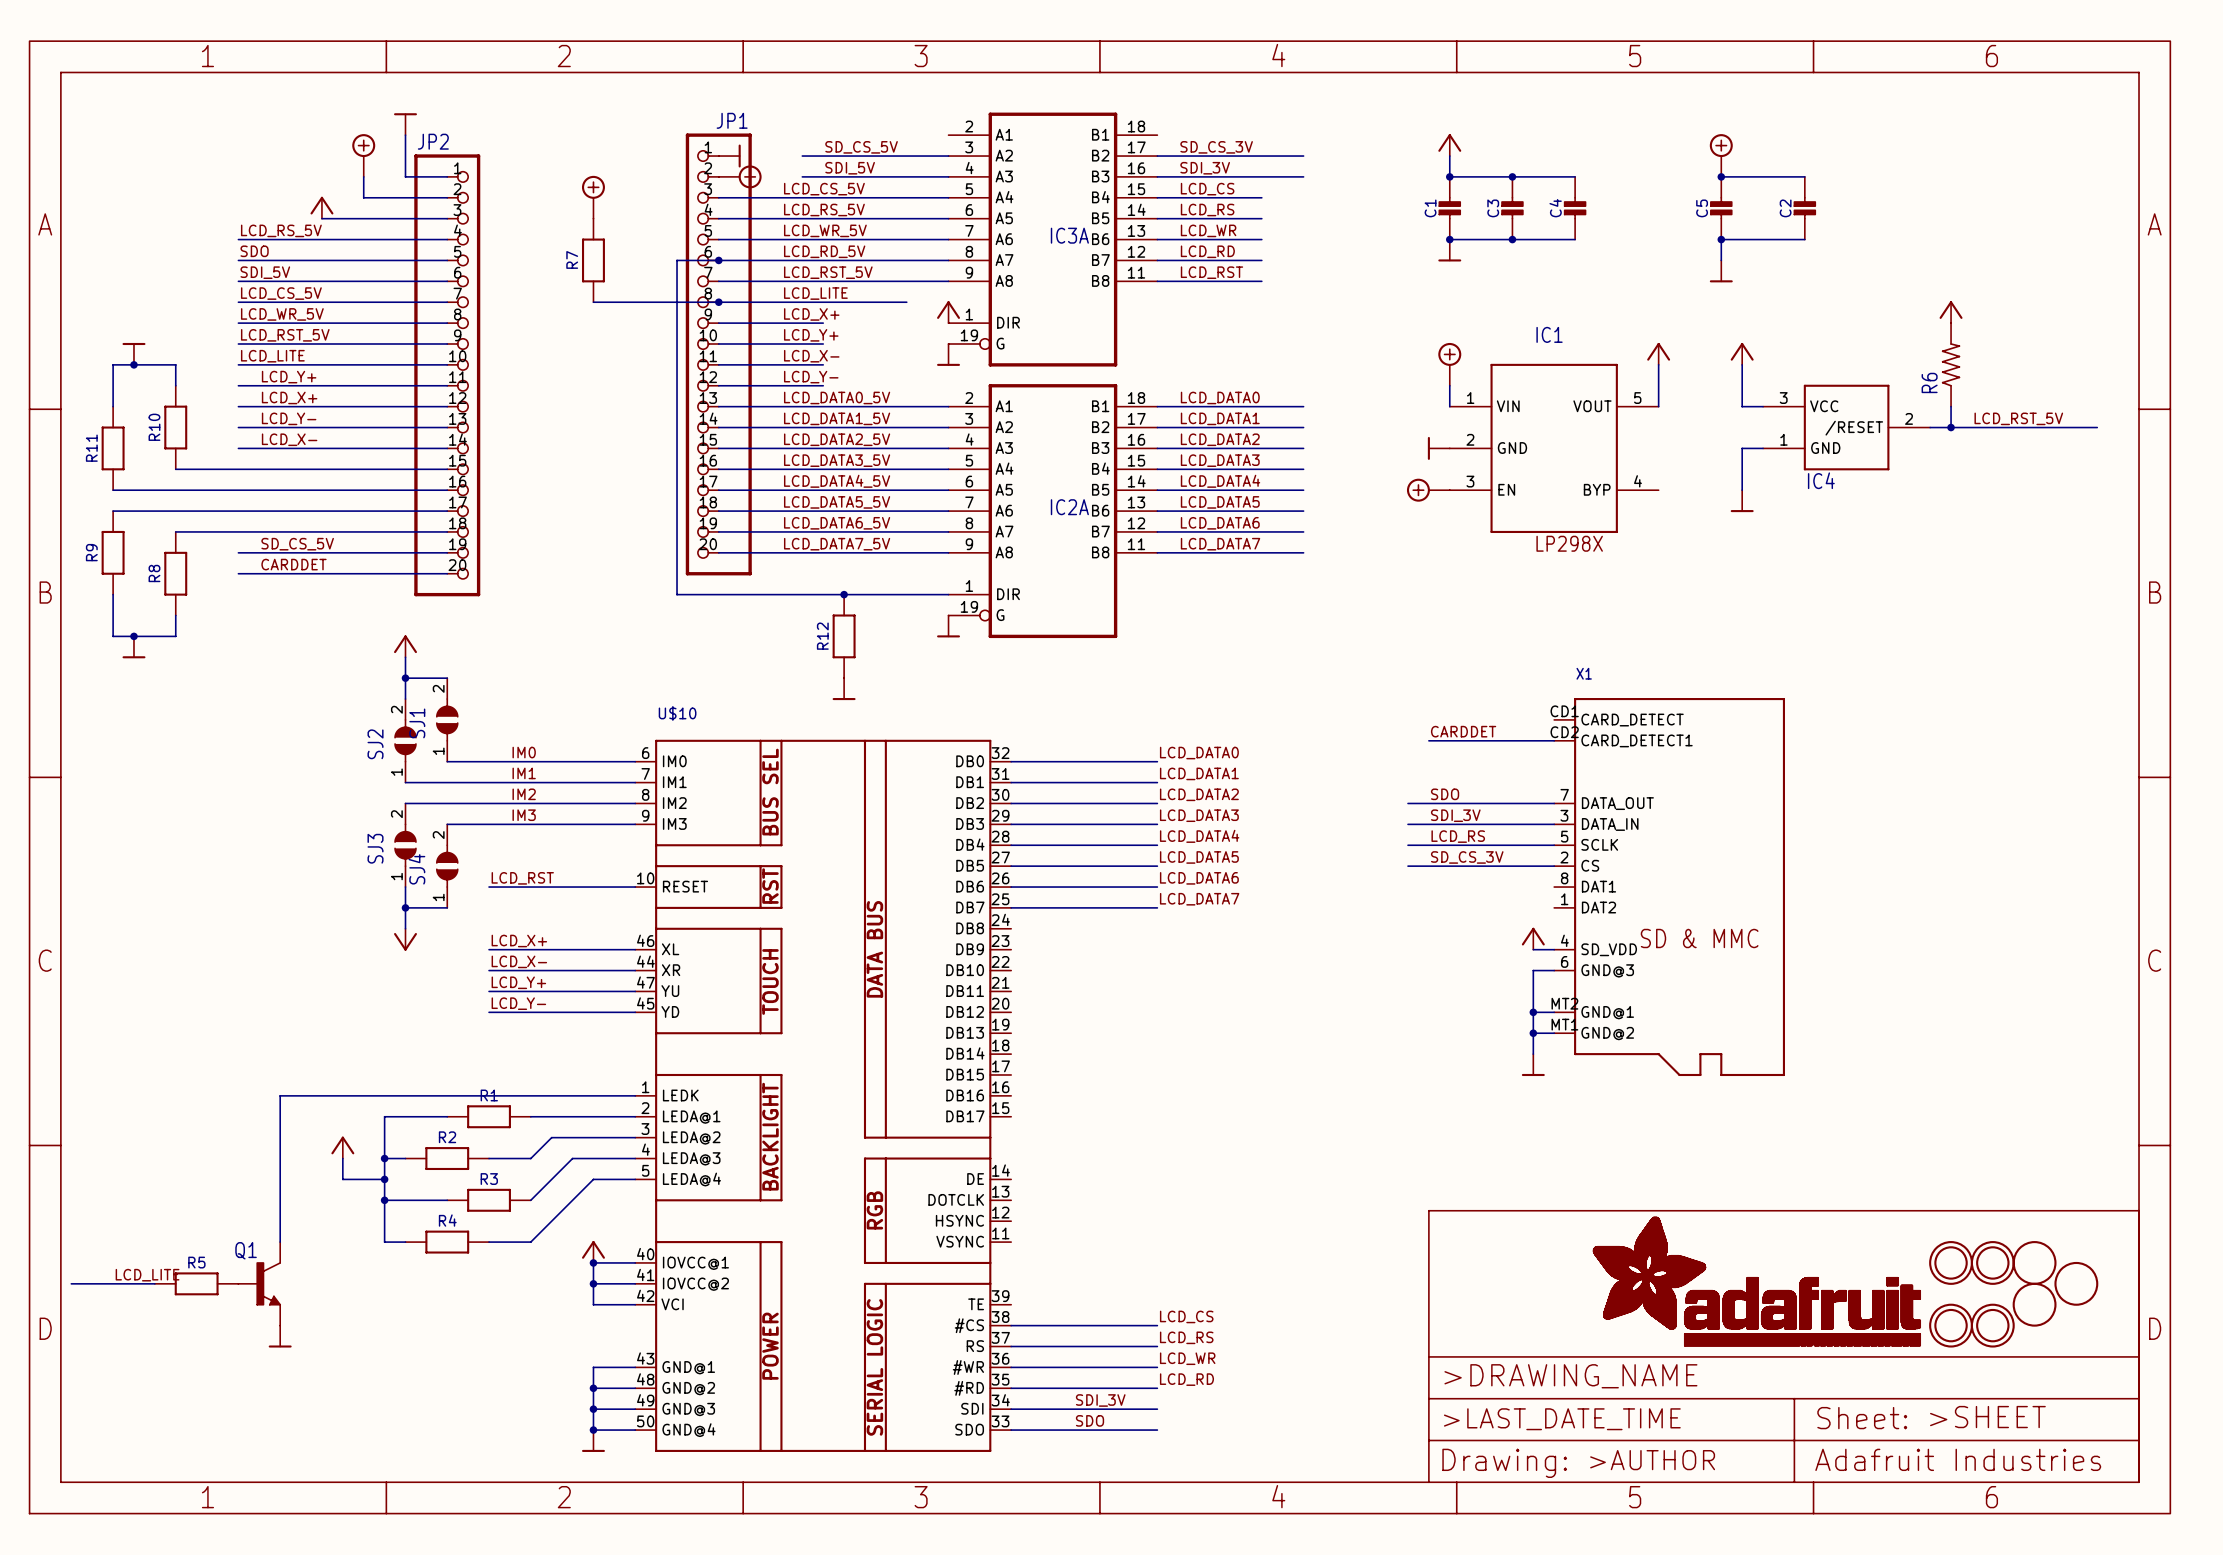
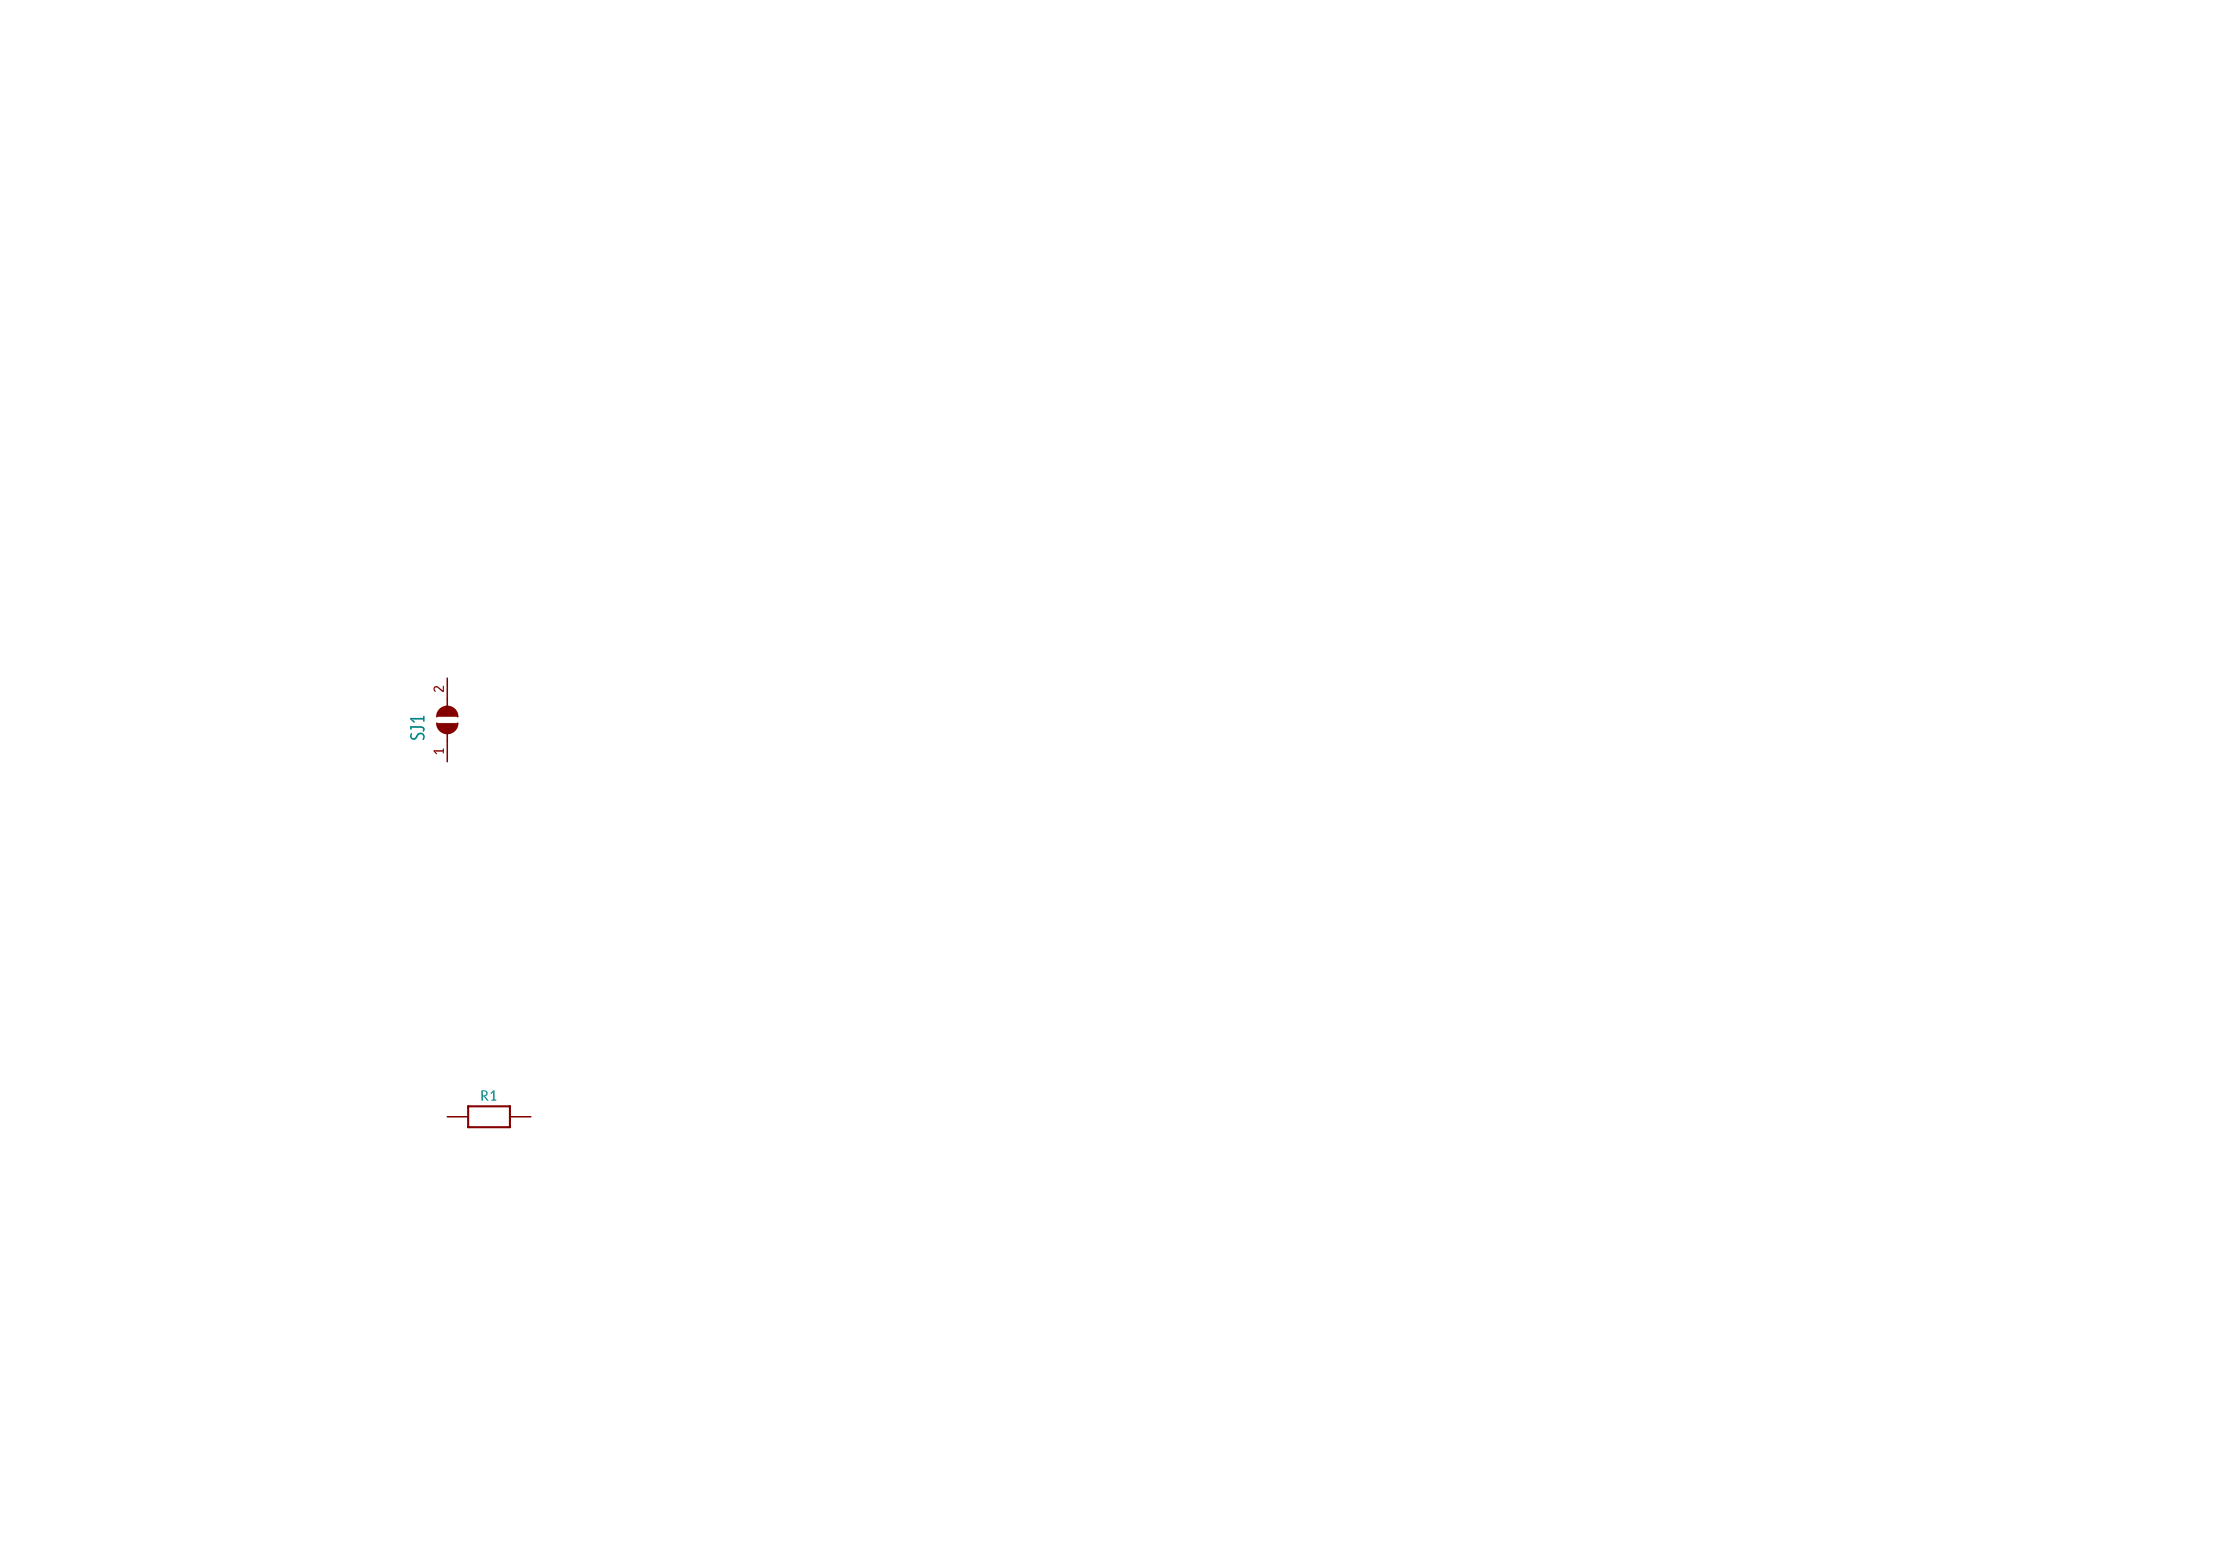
drawing: [29, 41, 2171, 1514] -> none
power symbol: (405, 124) -> none
wire: (405, 135) (405, 176) (447, 176) -> none
power symbol: (1449, 145) -> none
label: SD_CS_5V (861, 147) -> none
label: SD_CS_3V (1216, 147) -> none
power symbol: (363, 155) -> none
power symbol: (1721, 155) -> none
power symbol: (729, 156) -> none
wire: (802, 156) (948, 156) -> none
wire: (1157, 156) (1303, 156) -> none
wire: (1449, 156) (1449, 176) (1575, 176) -> none
label: SDI_5V (850, 168) -> none
label: SDI_3V (1205, 168) -> none
wire: (363, 176) (363, 197) (447, 197) -> none
power symbol: (740, 176) -> none
wire: (802, 176) (948, 176) -> none
wire: (1157, 176) (1303, 176) -> none
junction: (1449, 176) -> none
junction: (1512, 176) -> none
wire: (1721, 176) (1804, 176) -> none
junction: (1721, 176) -> none
label: LCD_CS_5V (824, 189) -> none
label: LCD_CS (1207, 189) -> none
power symbol: (593, 197) -> none
wire: (718, 197) (948, 197) -> none
wire: (1157, 197) (1261, 197) -> none
power symbol: (321, 207) -> none
C1: (1449, 208) -> none
C3: (1512, 208) -> none
C4: (1575, 208) -> none
C5: (1721, 208) -> none
C2: (1804, 208) -> none
label: LCD_RS_5V (824, 210) -> none
label: LCD_RS (1207, 210) -> none
wire: (321, 218) (447, 218) -> none
wire: (718, 218) (948, 218) -> none
wire: (1157, 218) (1261, 218) -> none
label: LCD_RS_5V (281, 230) -> none
label: LCD_WR_5V (825, 230) -> none
label: LCD_WR (1208, 230) -> none
wire: (238, 239) (447, 239) -> none
wire: (718, 239) (948, 239) -> none
IC3A: (1052, 239) -> none
wire: (1157, 239) (1261, 239) -> none
wire: (1449, 239) (1575, 239) -> none
junction: (1449, 239) -> none
junction: (1512, 239) -> none
junction: (1721, 239) -> none
wire: (1804, 239) (1721, 239) (1721, 260) -> none
power symbol: (1449, 250) -> none
label: SDO (254, 251) -> none
label: LCD_RD_5V (824, 251) -> none
label: LCD_RD (1207, 251) -> none
wire: (238, 260) (447, 260) -> none
R7: (593, 260) -> none
junction: (718, 260) -> none
wire: (948, 260) (677, 260) (677, 594) (948, 594) -> none
wire: (1157, 260) (1261, 260) -> none
power symbol: (1721, 271) -> none
label: SDI_5V (265, 272) -> none
label: LCD_RST_5V (828, 272) -> none
label: LCD_RST (1211, 272) -> none
wire: (238, 281) (447, 281) -> none
wire: (718, 281) (948, 281) -> none
wire: (1157, 281) (1261, 281) -> none
label: LCD_CS_5V (281, 293) -> none
label: LCD_LITE (815, 293) -> none
wire: (238, 302) (447, 302) -> none
wire: (593, 302) (906, 302) -> none
junction: (718, 302) -> none
power symbol: (948, 312) -> none
power symbol: (1951, 312) -> none
label: LCD_WR_5V (282, 314) -> none
label: LCD_X+ (811, 314) -> none
wire: (238, 323) (447, 323) -> none
wire: (718, 323) (823, 323) -> none
label: LCD_RST_5V (285, 335) -> none
label: LCD_Y+ (811, 335) -> none
wire: (238, 343) (447, 343) -> none
wire: (718, 343) (823, 343) -> none
power symbol: (133, 353) -> none
power symbol: (1658, 353) -> none
power symbol: (1742, 353) -> none
JP1: (718, 354) -> none
power symbol: (948, 354) -> none
label: LCD_LITE (272, 356) -> none
label: LCD_X- (811, 356) -> none
junction: (133, 364) -> none
wire: (238, 364) (447, 364) -> none
wire: (718, 364) (823, 364) -> none
power symbol: (1449, 364) -> none
wire: (1658, 364) (1658, 406) -> none
wire: (1742, 364) (1742, 406) (1763, 406) -> none
R6: (1951, 364) -> none
JP2: (447, 375) -> none
label: LCD_Y+ (289, 377) -> none
label: LCD_Y- (811, 377) -> none
wire: (175, 385) (175, 364) (113, 364) (113, 406) -> none
wire: (238, 385) (447, 385) -> none
wire: (718, 385) (823, 385) -> none
wire: (1449, 385) (1449, 406) -> none
label: LCD_X+ (289, 397) -> none
label: LCD_DATA0_5V (837, 397) -> none
label: LCD_DATA0 (1220, 397) -> none
wire: (238, 406) (447, 406) -> none
wire: (718, 406) (948, 406) -> none
wire: (1157, 406) (1303, 406) -> none
wire: (1951, 406) (1951, 427) -> none
label: LCD_Y- (289, 418) -> none
label: LCD_DATA1_5V (837, 418) -> none
label: LCD_DATA1 (1220, 418) -> none
label: LCD_RST_5V (2018, 418) -> none
R10: (175, 427) -> none
wire: (238, 427) (447, 427) -> none
wire: (718, 427) (948, 427) -> none
wire: (1157, 427) (1303, 427) -> none
IC4: (1846, 427) -> none
wire: (1930, 427) (2097, 427) -> none
junction: (1951, 427) -> none
label: LCD_X- (289, 439) -> none
label: LCD_DATA2_5V (837, 439) -> none
label: LCD_DATA2 (1220, 439) -> none
R11: (113, 448) -> none
wire: (238, 448) (447, 448) -> none
wire: (718, 448) (948, 448) -> none
wire: (1157, 448) (1303, 448) -> none
power symbol: (1438, 448) -> none
IC1: (1554, 448) -> none
wire: (1763, 448) (1742, 448) (1742, 490) -> none
label: LCD_DATA3_5V (837, 460) -> none
label: LCD_DATA3 (1220, 460) -> none
wire: (175, 469) (447, 469) -> none
wire: (718, 469) (948, 469) -> none
wire: (1157, 469) (1303, 469) -> none
label: LCD_DATA4_5V (837, 481) -> none
label: LCD_DATA4 (1220, 481) -> none
wire: (113, 490) (447, 490) -> none
wire: (718, 490) (948, 490) -> none
wire: (1157, 490) (1303, 490) -> none
power symbol: (1428, 490) -> none
power symbol: (1742, 501) -> none
label: LCD_DATA5_5V (837, 502) -> none
label: LCD_DATA5 (1220, 502) -> none
wire: (113, 511) (447, 511) -> none
wire: (718, 511) (948, 511) -> none
IC2A: (1052, 511) -> none
wire: (1157, 511) (1303, 511) -> none
label: LCD_DATA6_5V (837, 523) -> none
label: LCD_DATA6 (1220, 523) -> none
wire: (175, 531) (447, 531) -> none
wire: (718, 531) (948, 531) -> none
wire: (1157, 531) (1303, 531) -> none
label: SD_CS_5V (297, 544) -> none
label: LCD_DATA7_5V (837, 544) -> none
label: LCD_DATA7 (1220, 544) -> none
R9: (113, 552) -> none
wire: (238, 552) (447, 552) -> none
wire: (718, 552) (948, 552) -> none
wire: (1157, 552) (1303, 552) -> none
label: CARDDET (293, 564) -> none
R8: (175, 573) -> none
wire: (238, 573) (447, 573) -> none
wire: (113, 594) (113, 636) (175, 636) (175, 615) -> none
junction: (844, 594) -> none
power symbol: (948, 626) -> none
junction: (133, 636) -> none
R12: (844, 636) -> none
power symbol: (405, 646) -> none
power symbol: (133, 647) -> none
wire: (405, 657) (405, 699) -> none
wire: (405, 678) (447, 678) -> none
junction: (405, 678) -> none
power symbol: (844, 689) -> none
label: CARDDET (1463, 731) -> none
SJ2: (405, 740) -> none
wire: (1428, 740) (1554, 740) -> none
label: IM0 (524, 752) -> none
label: LCD_DATA0 (1199, 753) -> none
wire: (447, 761) (635, 761) -> none
wire: (1011, 761) (1157, 761) -> none
label: IM1 (524, 773) -> none
label: LCD_DATA1 (1199, 773) -> none
wire: (405, 782) (635, 782) -> none
wire: (1011, 782) (1157, 782) -> none
label: IM2 (524, 794) -> none
label: LCD_DATA2 (1199, 794) -> none
label: SDO (1445, 794) -> none
wire: (405, 803) (635, 803) -> none
wire: (1011, 803) (1157, 803) -> none
wire: (1408, 803) (1554, 803) -> none
label: IM3 (524, 815) -> none
label: LCD_DATA3 (1199, 815) -> none
label: SDI_3V (1455, 815) -> none
wire: (447, 824) (635, 824) -> none
wire: (1011, 824) (1157, 824) -> none
wire: (1408, 824) (1554, 824) -> none
label: LCD_DATA4 (1199, 836) -> none
label: LCD_RS (1458, 836) -> none
SJ3: (405, 845) -> none
wire: (1011, 845) (1157, 845) -> none
wire: (1408, 845) (1554, 845) -> none
label: LCD_DATA5 (1199, 857) -> none
label: SD_CS_3V (1467, 857) -> none
SJ4: (447, 866) -> none
wire: (1011, 866) (1157, 866) -> none
wire: (1408, 866) (1554, 866) -> none
label: LCD_RST (522, 878) -> none
label: LCD_DATA6 (1199, 878) -> none
wire: (405, 887) (405, 928) -> none
wire: (489, 887) (635, 887) -> none
wire: (1011, 887) (1157, 887) -> none
X1: (1669, 887) -> none
label: LCD_DATA7 (1199, 899) -> none
wire: (405, 907) (447, 907) -> none
junction: (405, 907) -> none
wire: (1011, 907) (1157, 907) -> none
power symbol: (1533, 938) -> none
power symbol: (405, 939) -> none
label: LCD_X+ (519, 941) -> none
wire: (489, 949) (635, 949) -> none
wire: (1533, 949) (1554, 949) -> none
label: LCD_X- (519, 961) -> none
wire: (489, 970) (635, 970) -> none
wire: (1554, 970) (1533, 970) (1533, 1054) -> none
label: LCD_Y+ (518, 982) -> none
wire: (489, 991) (635, 991) -> none
label: LCD_Y- (518, 1003) -> none
wire: (489, 1012) (635, 1012) -> none
wire: (1533, 1012) (1554, 1012) -> none
junction: (1533, 1012) -> none
wire: (1533, 1033) (1554, 1033) -> none
junction: (1533, 1033) -> none
power symbol: (1533, 1065) -> none
wire: (635, 1095) (280, 1095) (280, 1242) -> none
U$10: (823, 1095) -> none
wire: (447, 1116) (384, 1116) (384, 1242) (405, 1242) -> none
wire: (530, 1116) (635, 1116) -> none
wire: (635, 1137) (551, 1137) (530, 1158) (489, 1158) -> none
power symbol: (342, 1147) -> none
wire: (342, 1158) (342, 1179) (384, 1179) -> none
wire: (384, 1158) (405, 1158) -> none
junction: (384, 1158) -> none
R2: (447, 1158) -> none
wire: (635, 1158) (572, 1158) (530, 1200) -> none
junction: (384, 1179) -> none
wire: (635, 1179) (593, 1179) (530, 1242) (489, 1242) -> none
wire: (384, 1200) (447, 1200) -> none
junction: (384, 1200) -> none
R3: (489, 1200) -> none
R4: (447, 1242) -> none
power symbol: (593, 1252) -> none
junction: (593, 1262) -> none
wire: (635, 1262) (593, 1262) (593, 1304) (635, 1304) -> none
part: (1951, 1262) -> none
part: (1992, 1262) -> none
part: (2034, 1262) -> none
label: LCD_LITE (147, 1275) -> none
wire: (71, 1283) (154, 1283) -> none
R5: (196, 1283) -> none
Q1: (259, 1283) -> none
wire: (593, 1283) (635, 1283) -> none
junction: (593, 1283) -> none
part: (2076, 1283) -> none
part: (2034, 1304) -> none
label: LCD_CS (1186, 1316) -> none
wire: (1011, 1325) (1157, 1325) -> none
part: (1951, 1325) -> none
part: (1992, 1325) -> none
power symbol: (280, 1336) -> none
label: LCD_RS (1186, 1337) -> none
wire: (1011, 1346) (1157, 1346) -> none
label: LCD_WR (1187, 1358) -> none
wire: (635, 1367) (593, 1367) (593, 1430) (635, 1430) -> none
wire: (1011, 1367) (1157, 1367) -> none
label: LCD_RD (1186, 1379) -> none
wire: (593, 1388) (635, 1388) -> none
junction: (593, 1388) -> none
wire: (1011, 1388) (1157, 1388) -> none
label: SDI_3V (1100, 1400) -> none
wire: (593, 1409) (635, 1409) -> none
junction: (593, 1409) -> none
wire: (1011, 1409) (1157, 1409) -> none
label: SDO (1090, 1420) -> none
junction: (593, 1430) -> none
wire: (1011, 1430) (1157, 1430) -> none
power symbol: (593, 1441) -> none

